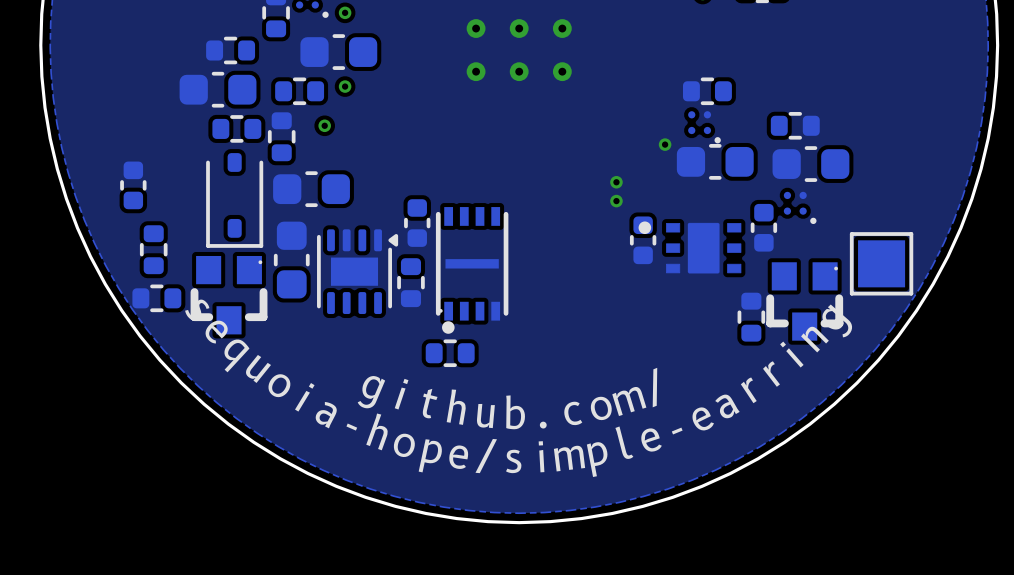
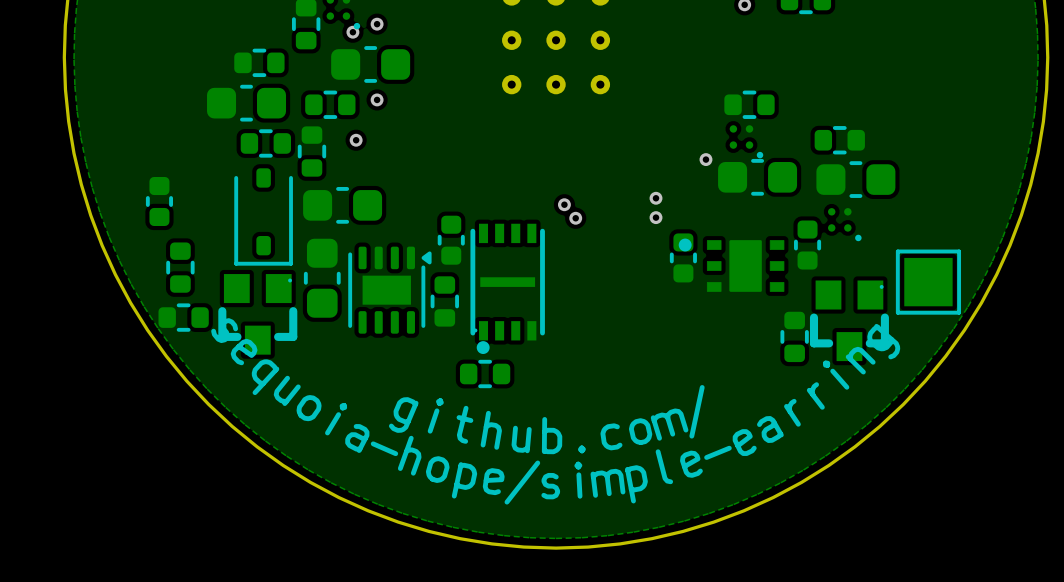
via: none -> (352, 32)
via: none -> (564, 204)
via: none -> (575, 218)

